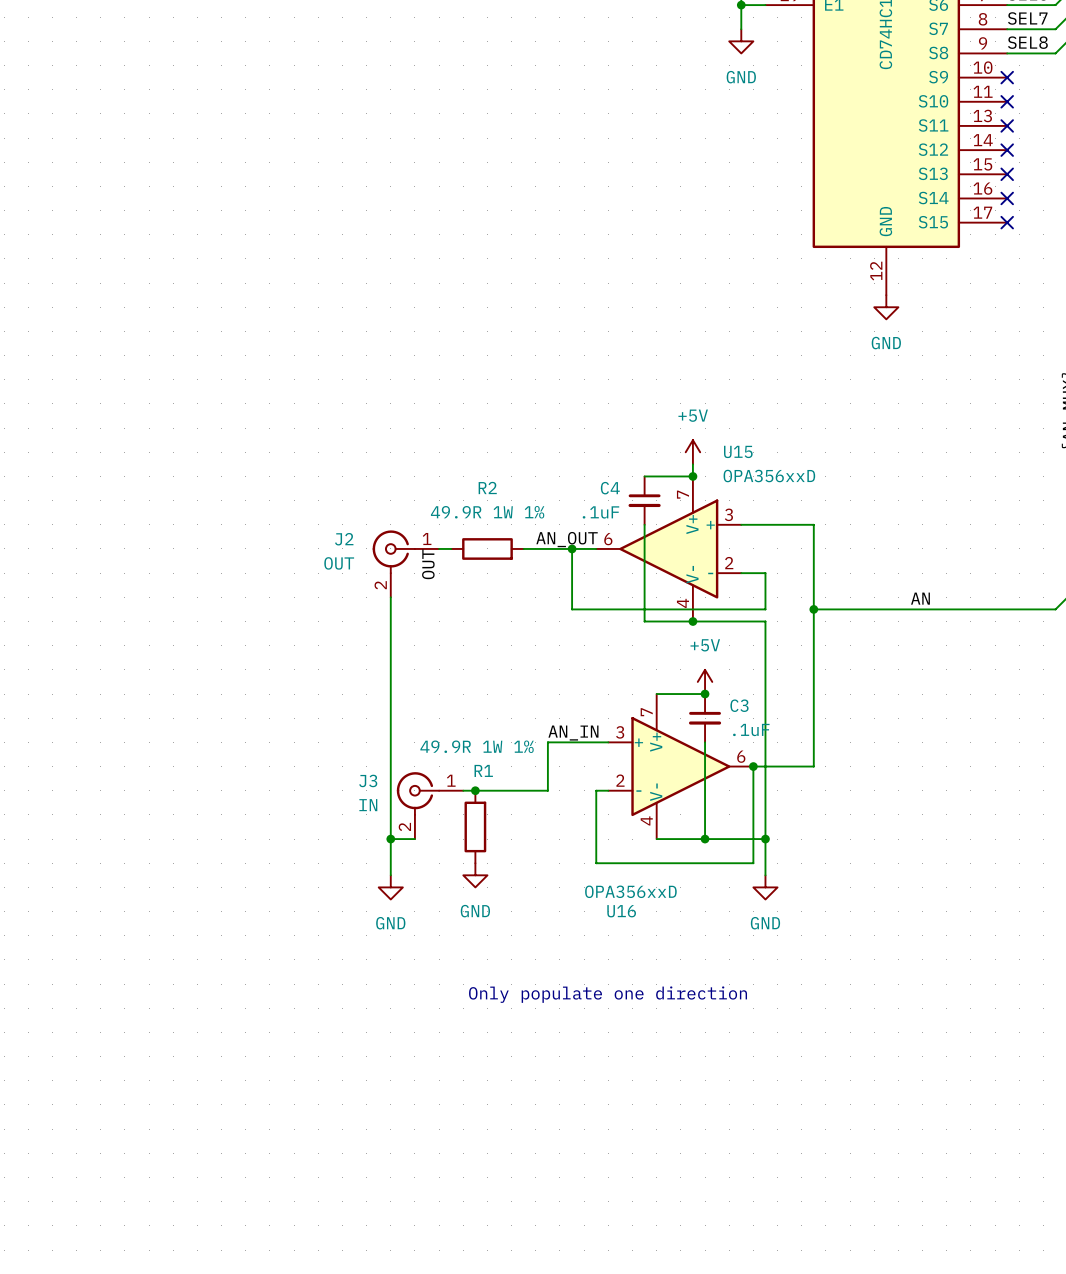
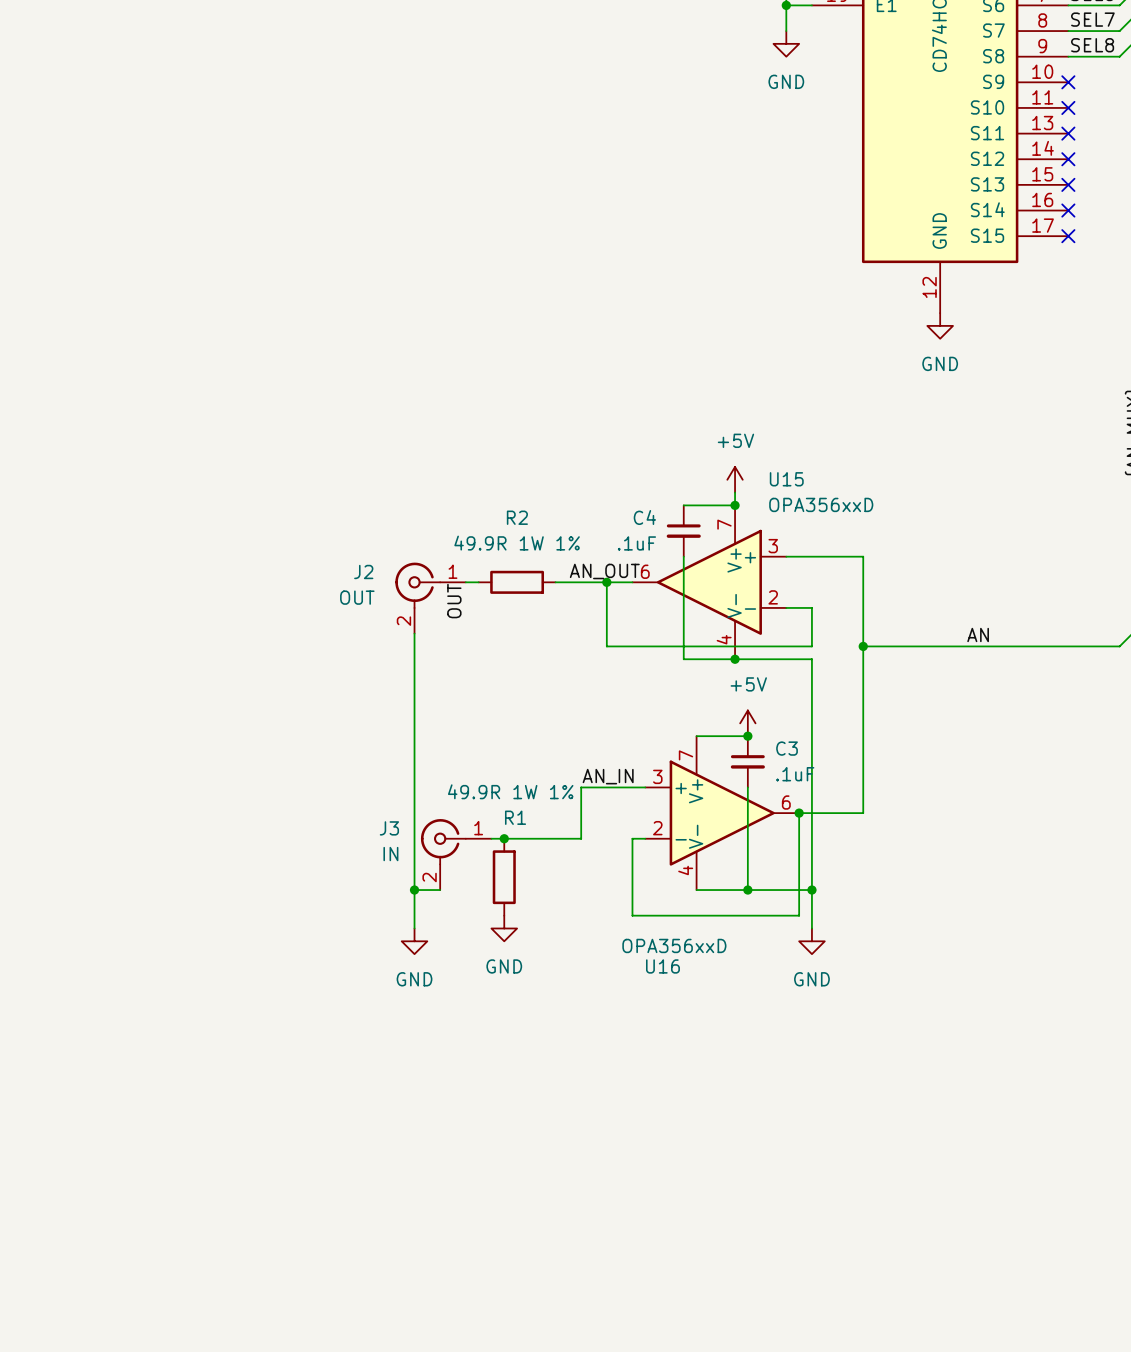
text: Only populate one direction (608, 994) -> none

